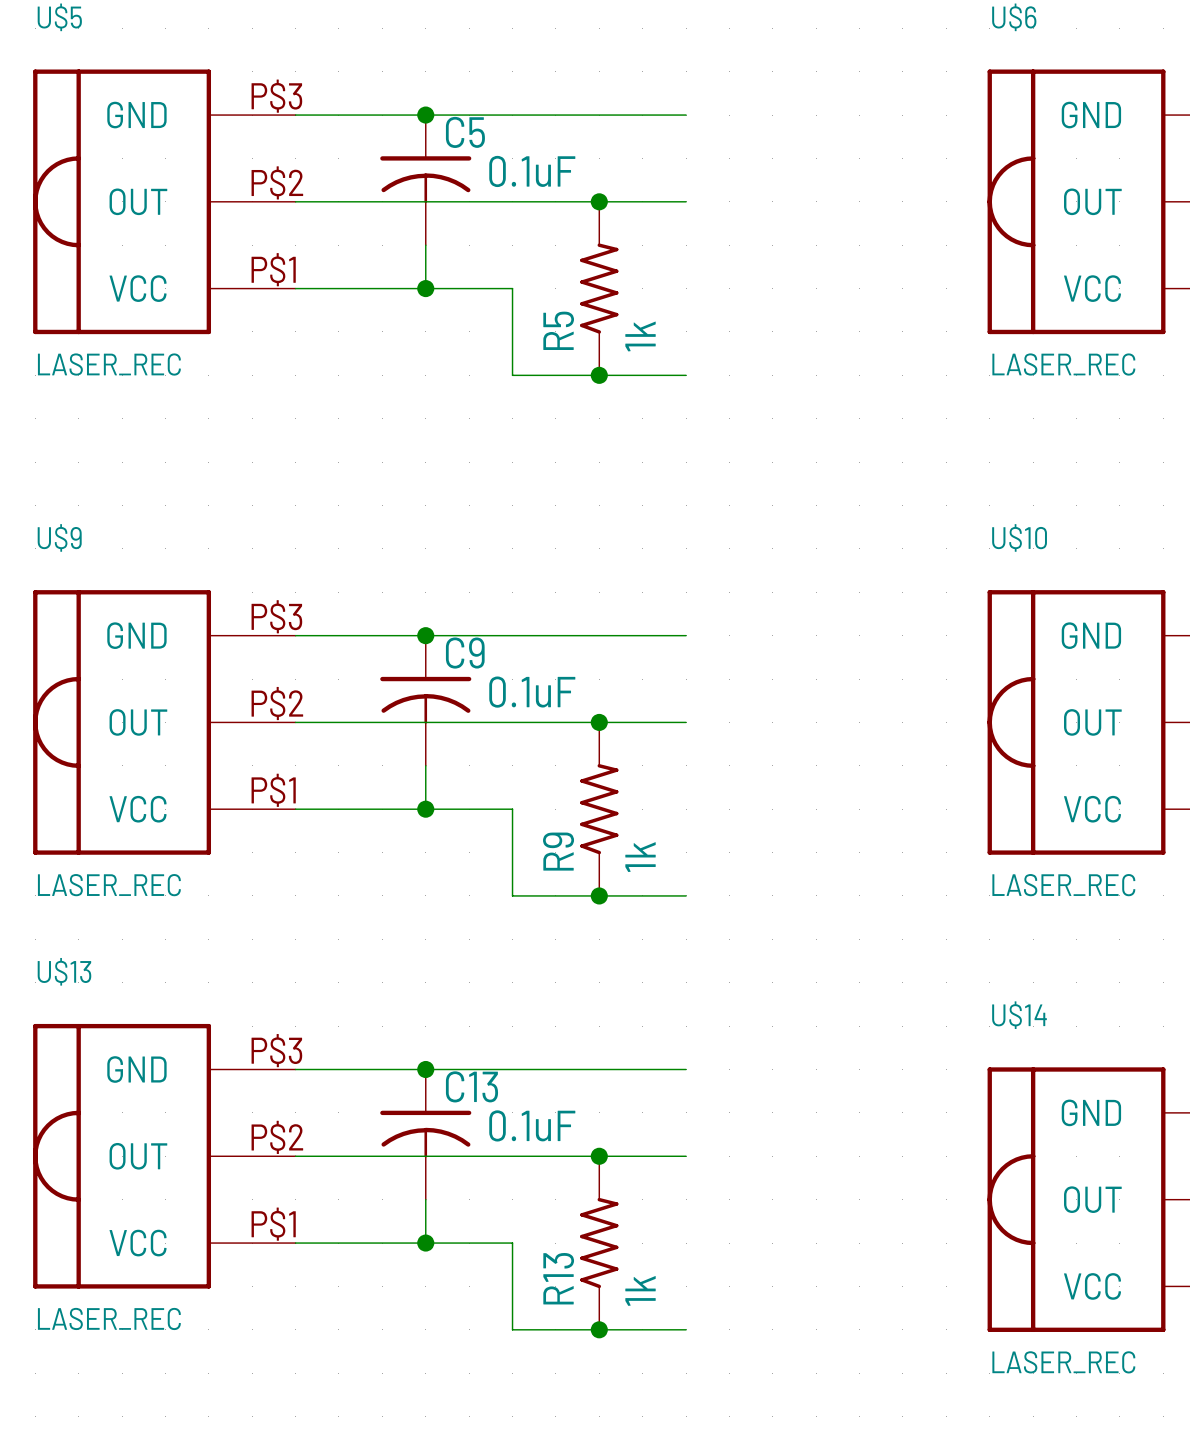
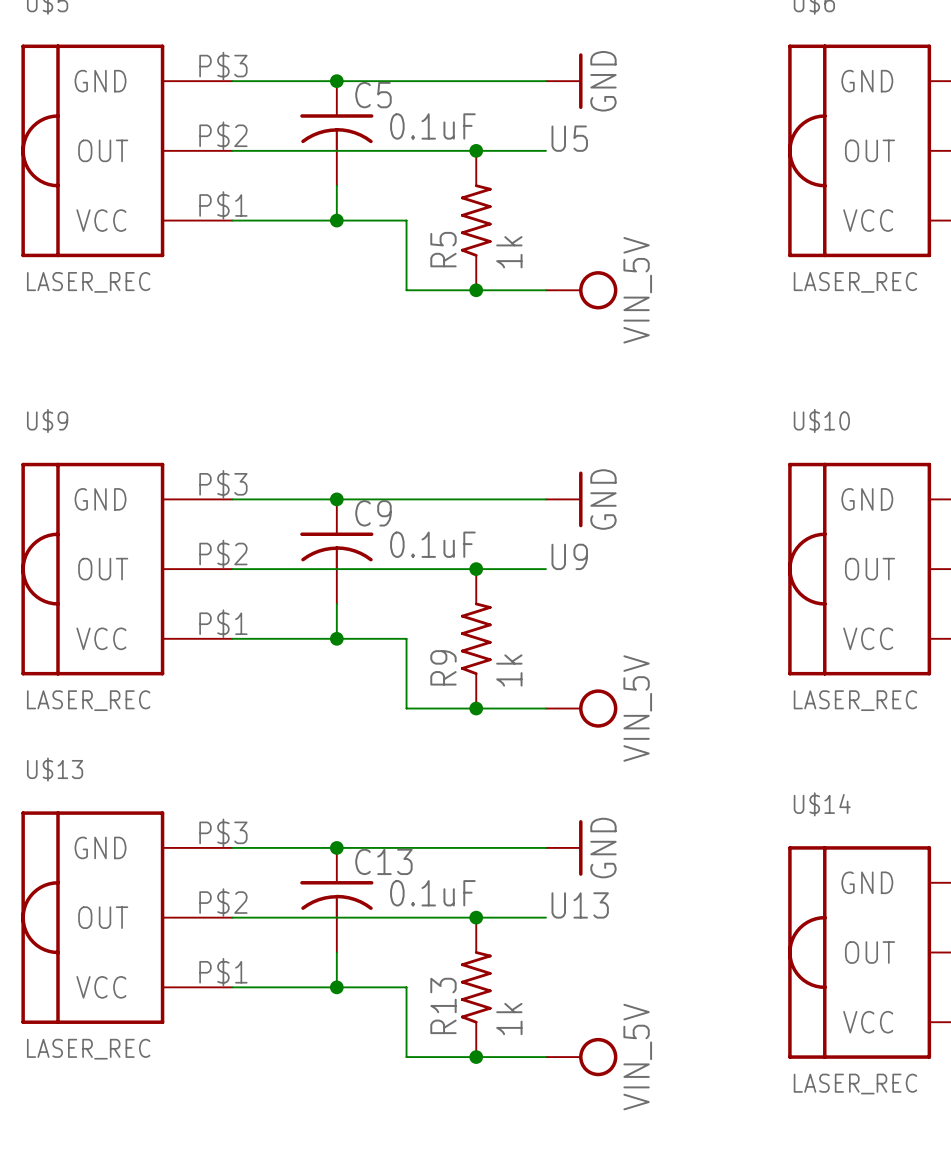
power symbol: none -> GND (564, 81)
label: none -> U5 (569, 138)
power symbol: none -> VIN_5V (581, 290)
power symbol: none -> GND (564, 499)
label: none -> U9 (569, 556)
power symbol: none -> VIN_5V (581, 708)
power symbol: none -> GND (564, 847)
label: none -> U13 (580, 905)
power symbol: none -> VIN_5V (581, 1057)

